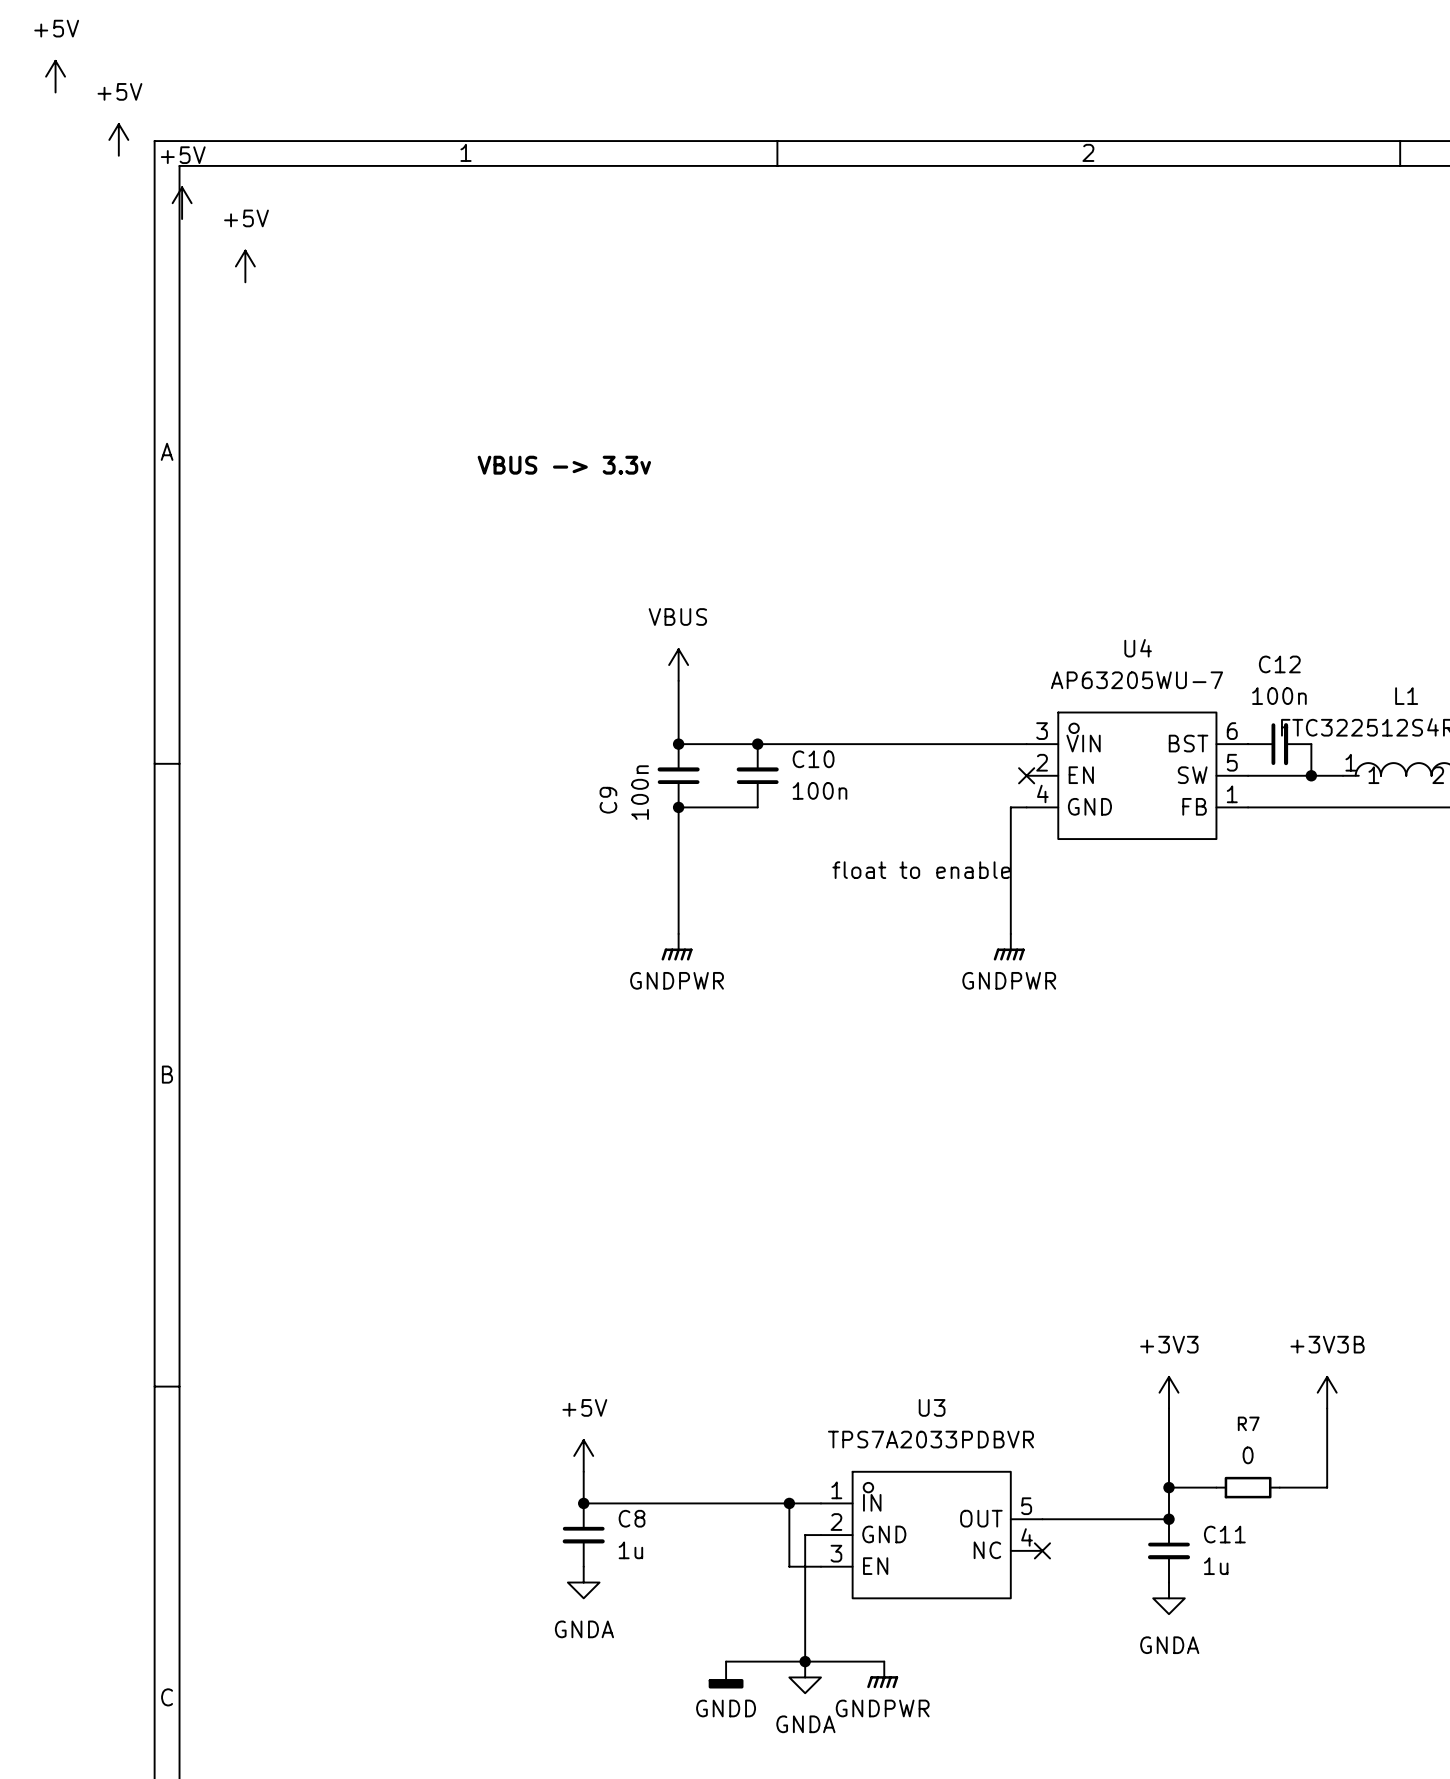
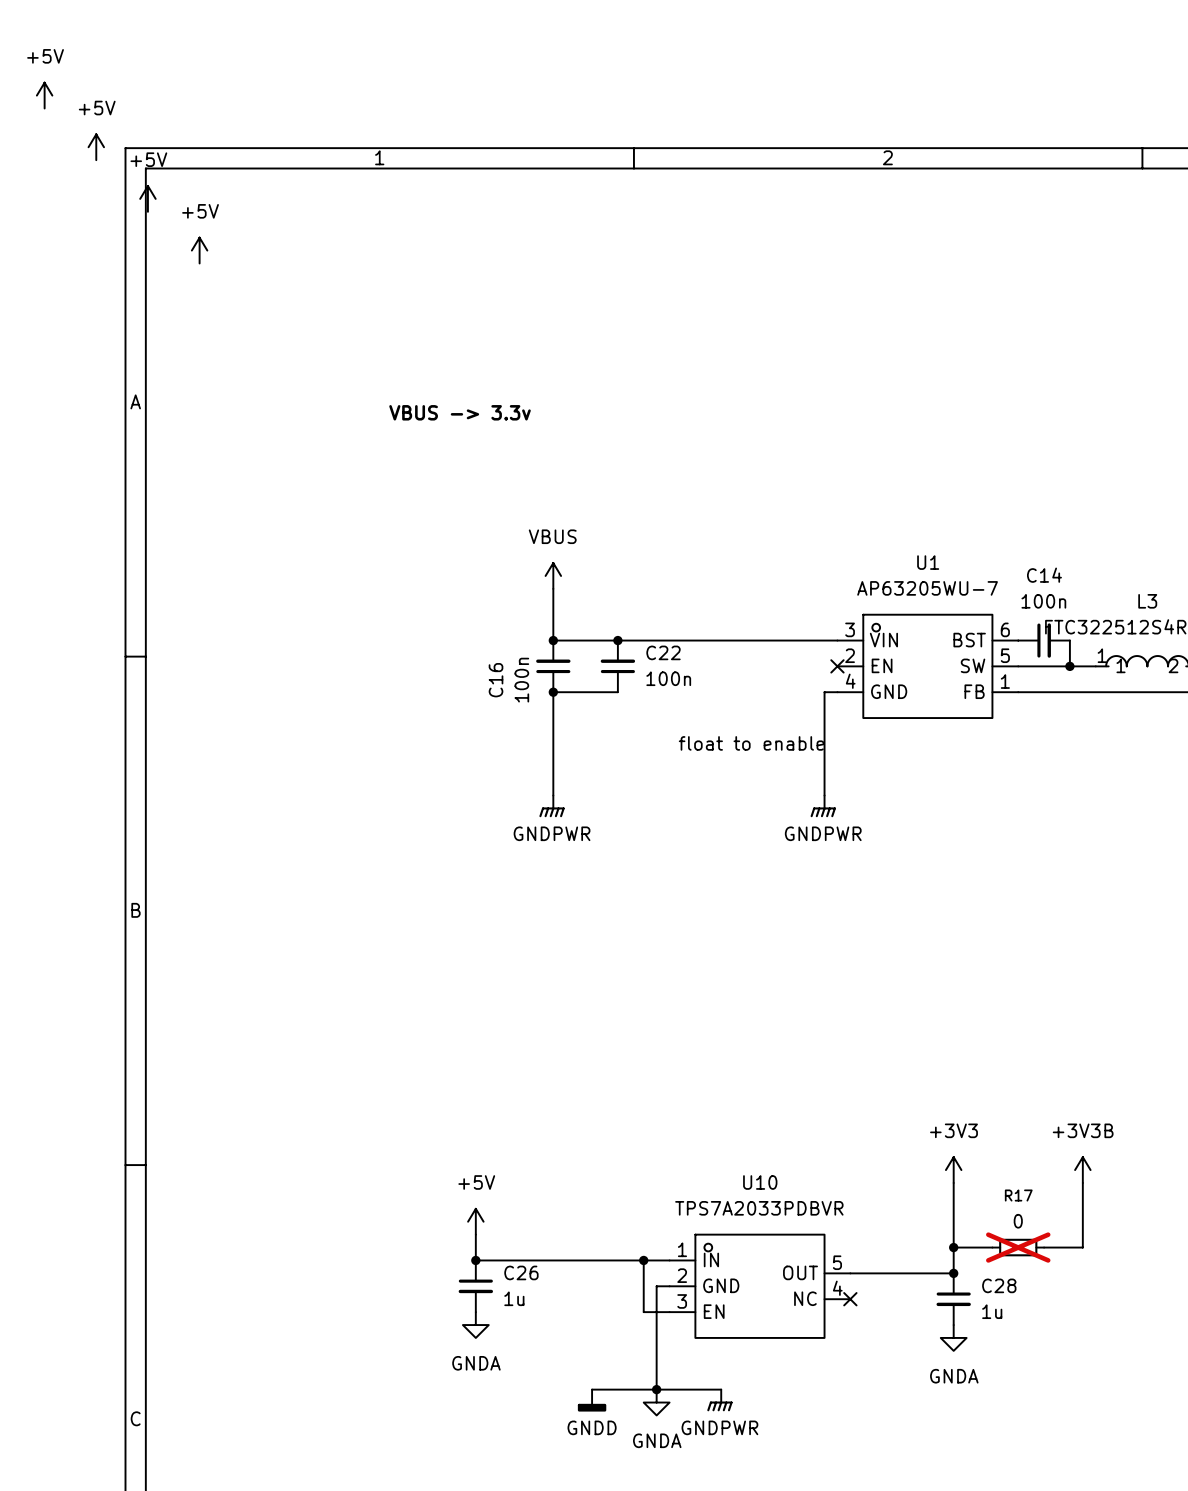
U4 name: U4 (1138, 648) -> U1 (928, 562)
C12 name: C12 (1279, 664) -> C14 (1044, 575)
L1 name: L1 (1406, 696) -> L3 (1147, 601)
C10 name: C10 (813, 759) -> C22 (663, 652)
C9 name: C9 (608, 800) -> C16 (496, 680)
U3 name: U3 (932, 1407) -> U10 (760, 1182)
R7 name: R7 (1248, 1423) -> R17 (1018, 1195)
R7 do-not-place cross: none -> (1018, 1247)
C8 name: C8 (632, 1518) -> C26 (521, 1272)
C11 name: C11 (1224, 1534) -> C28 (999, 1285)

